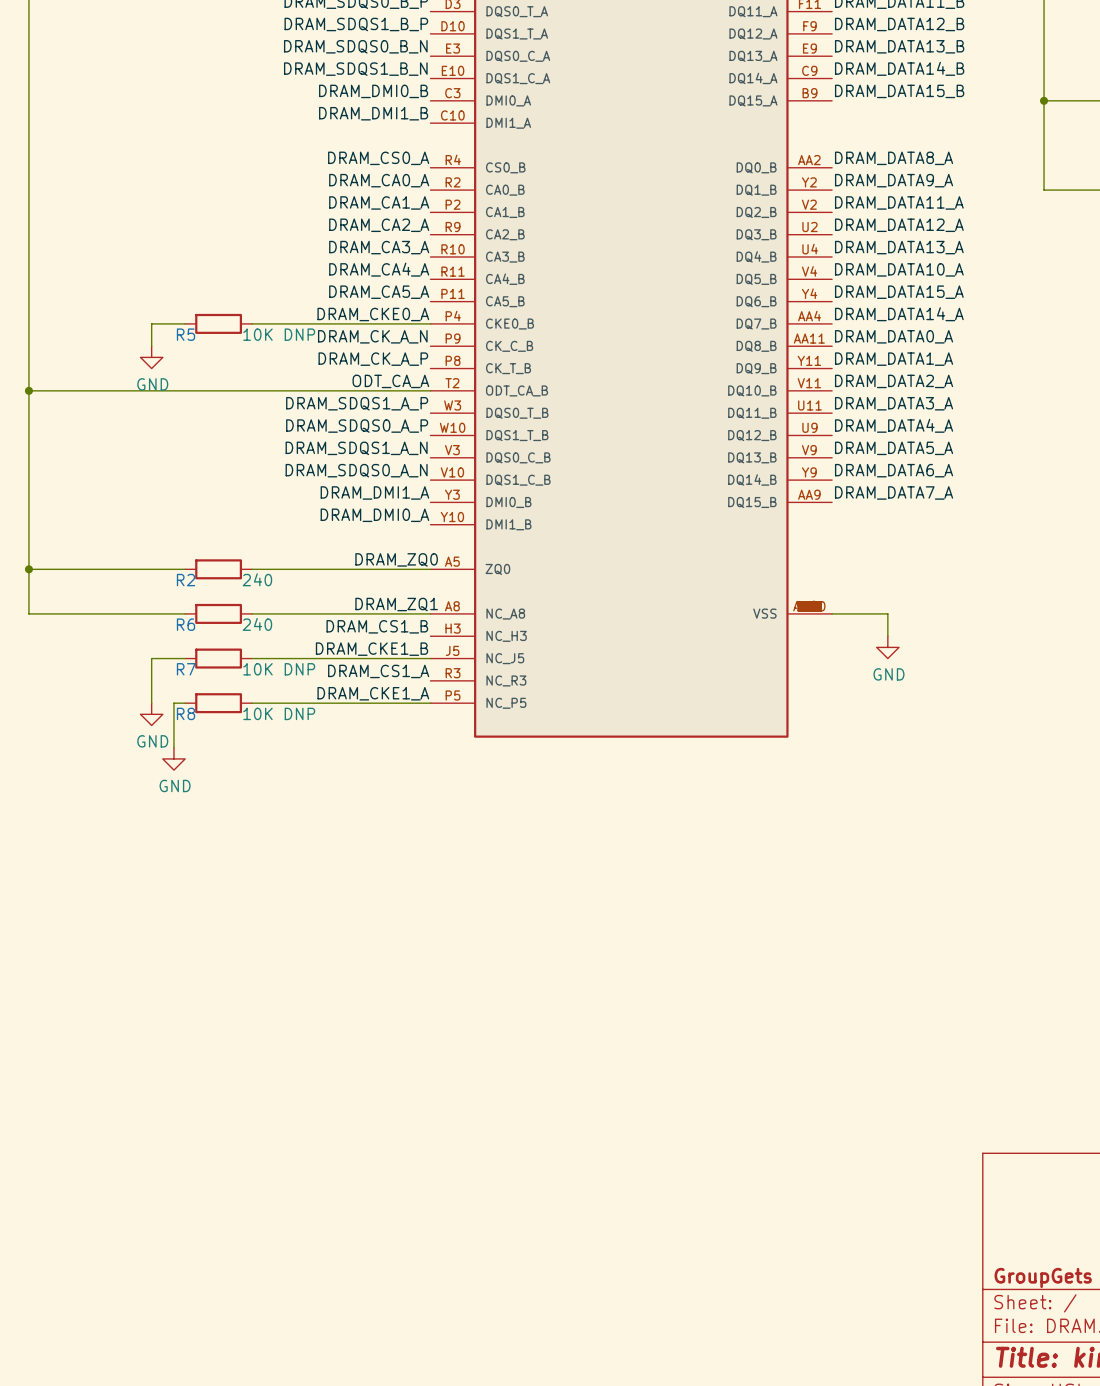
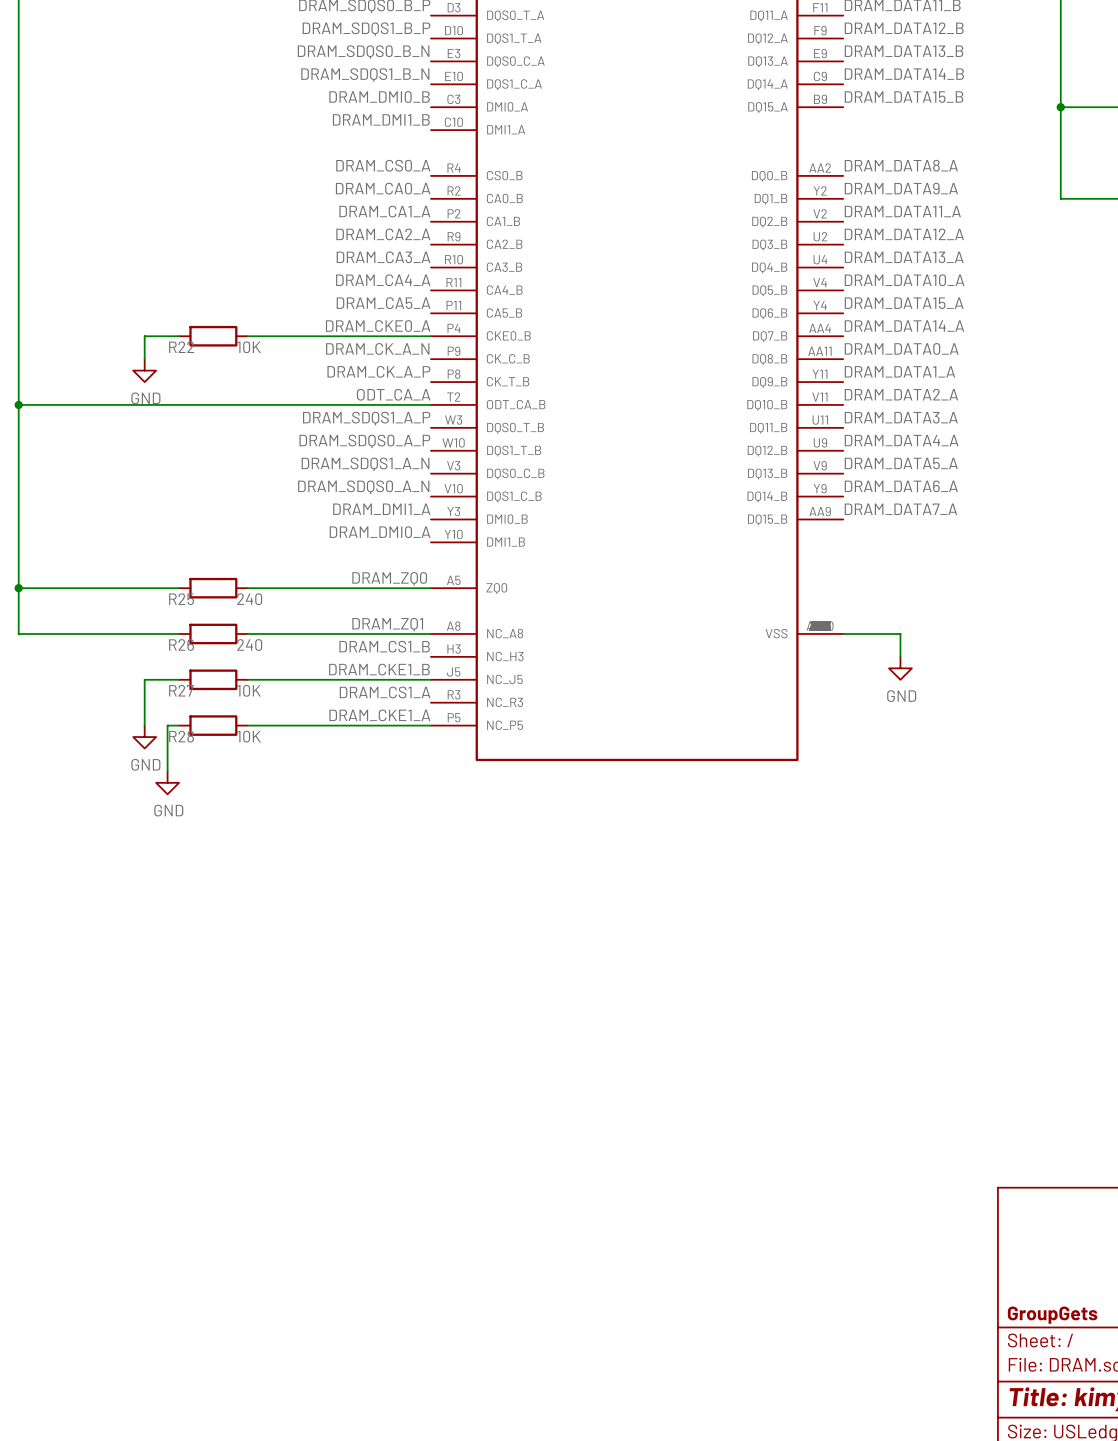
R5 name: R5 (186, 334) -> R22 (181, 347)
R5 value: 10K DNP (279, 334) -> 10K (249, 347)
R2 name: R2 (186, 580) -> R25 (181, 599)
R6 name: R6 (186, 624) -> R26 (181, 645)
R7 name: R7 (186, 669) -> R27 (181, 690)
R7 value: 10K DNP (279, 669) -> 10K (249, 690)
R8 name: R8 (186, 713) -> R28 (181, 736)
R8 value: 10K DNP (279, 713) -> 10K (249, 736)

